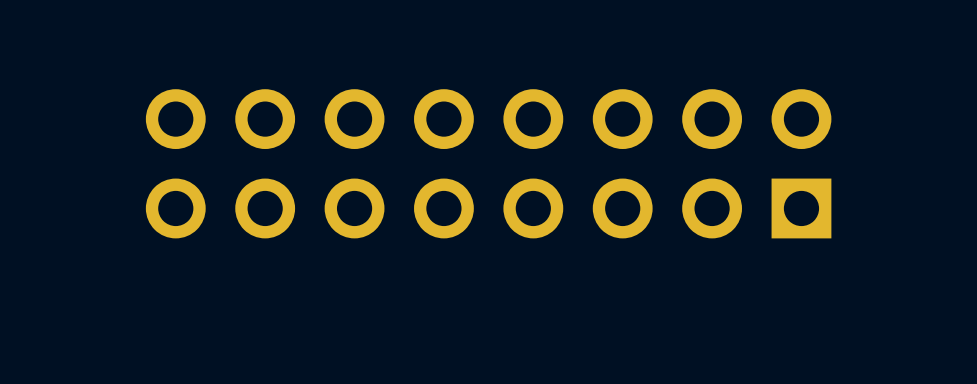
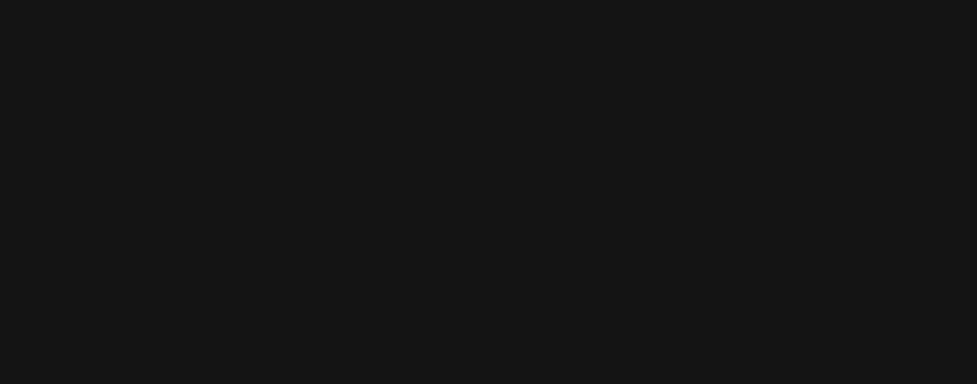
part: (488, 163) -> none

